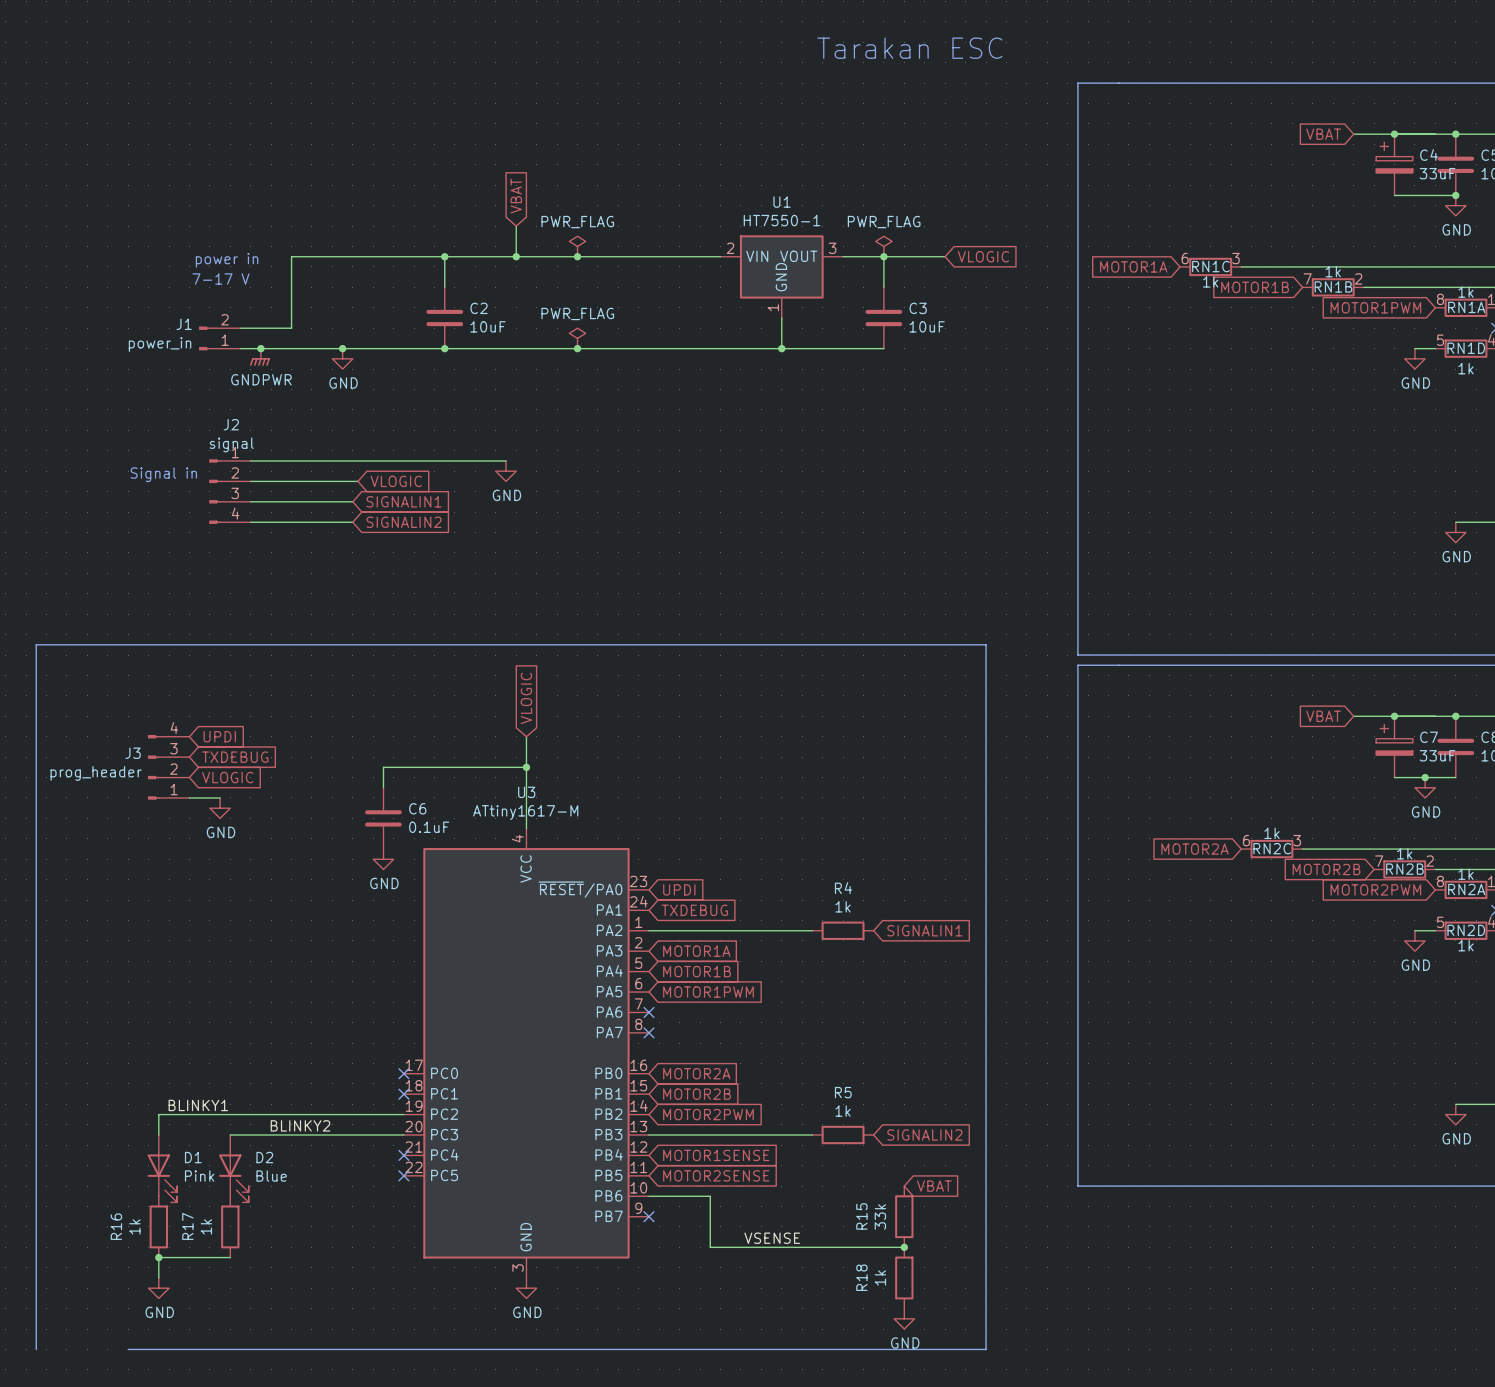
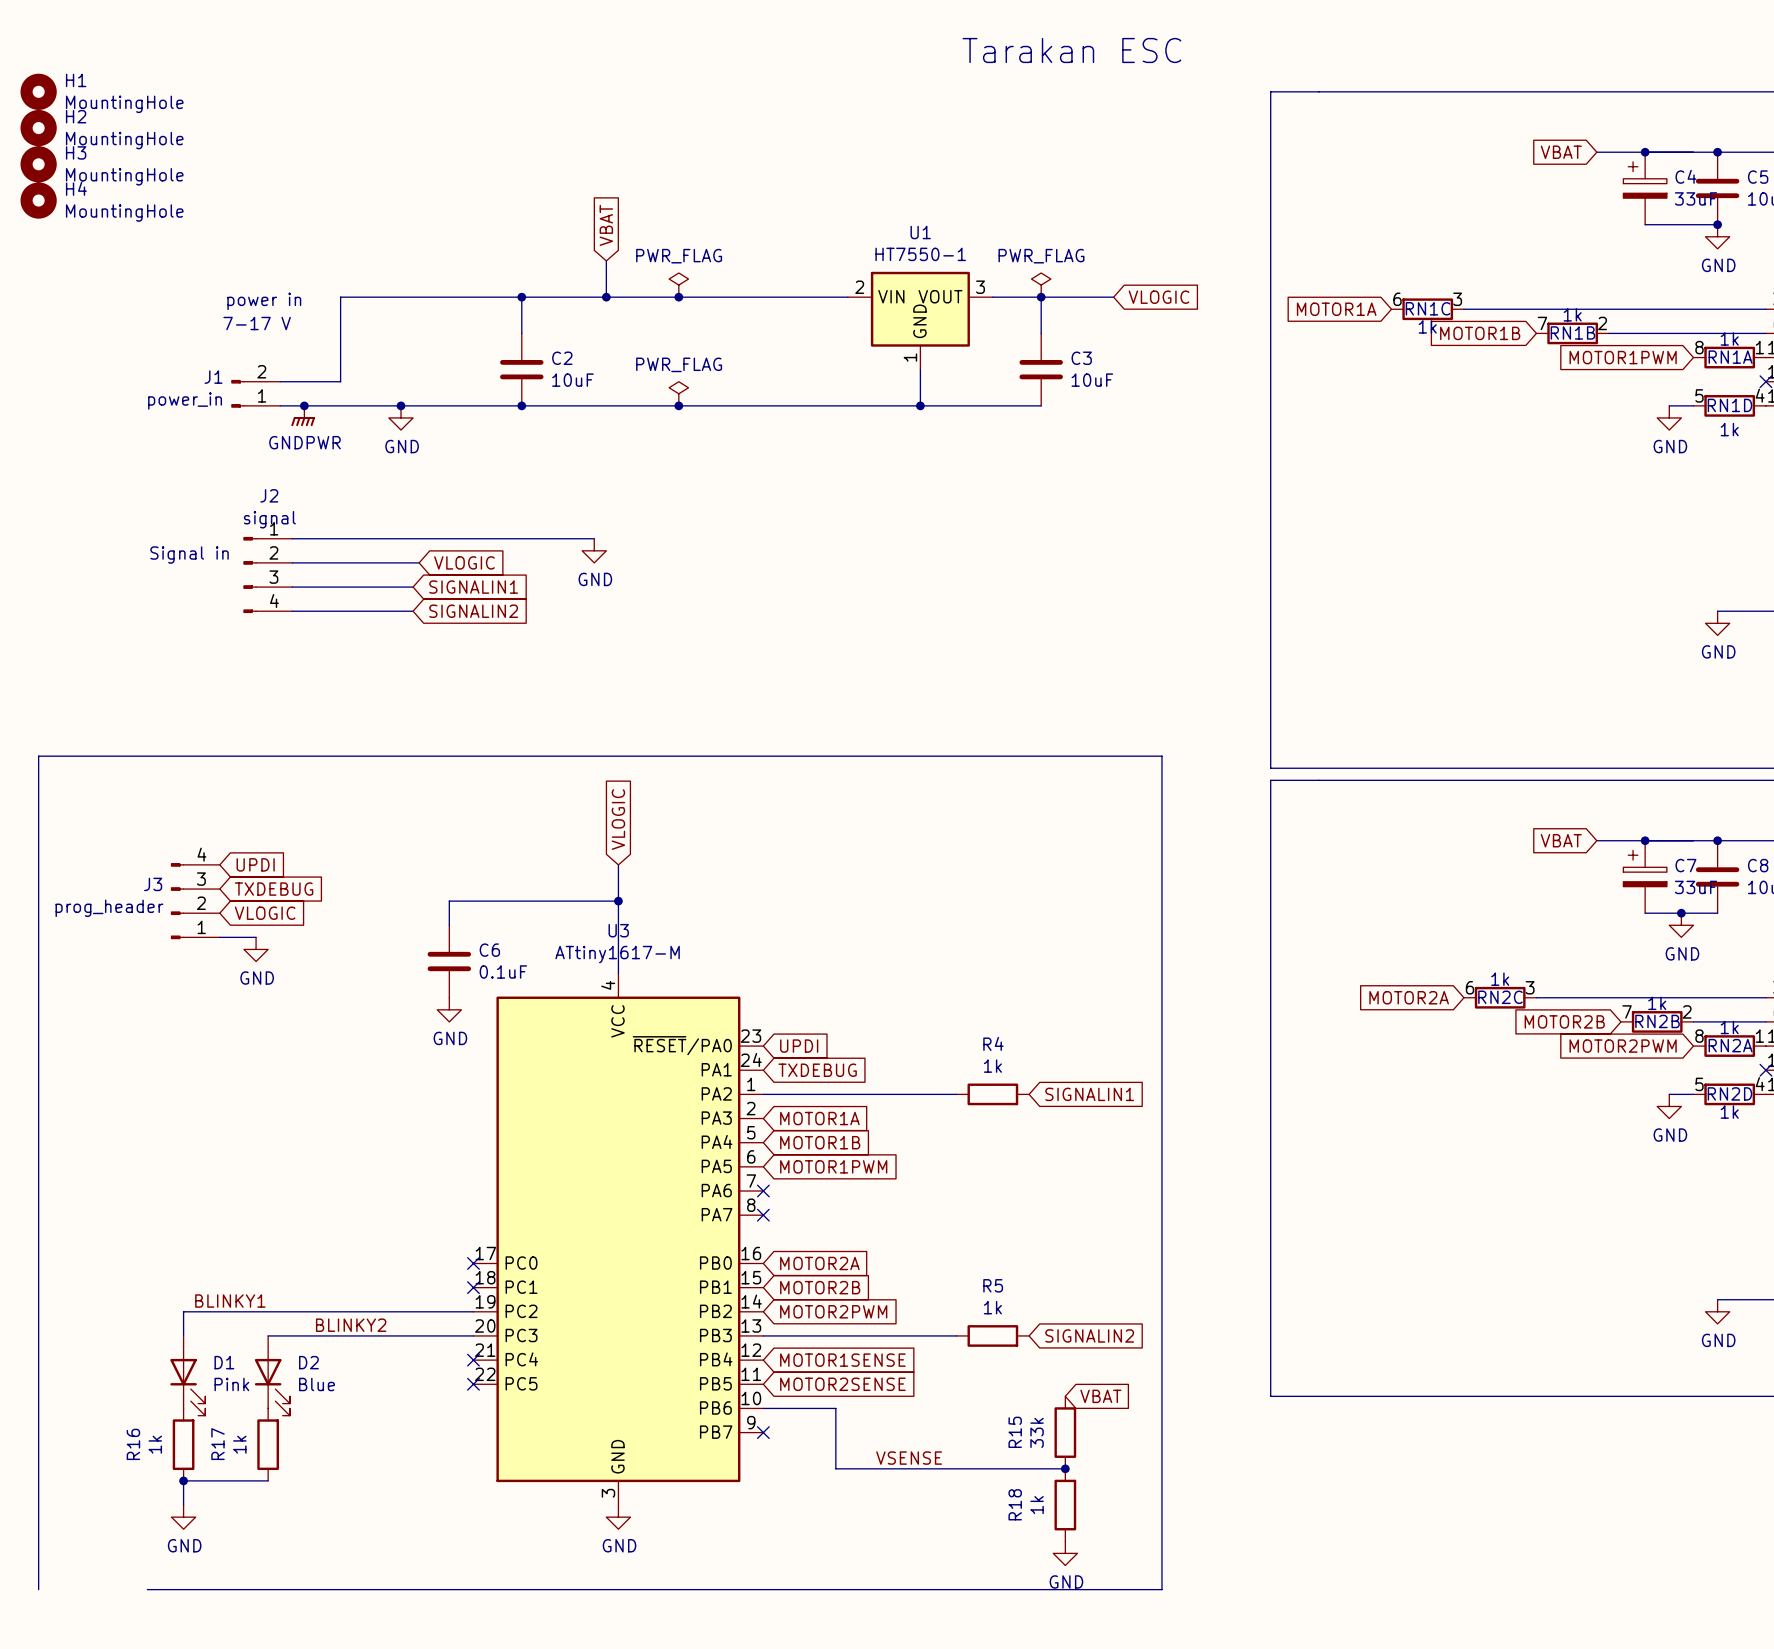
H1: none -> MountingHole (38, 91)
H2: none -> MountingHole (38, 128)
H3: none -> MountingHole (38, 164)
H4: none -> MountingHole (38, 200)

